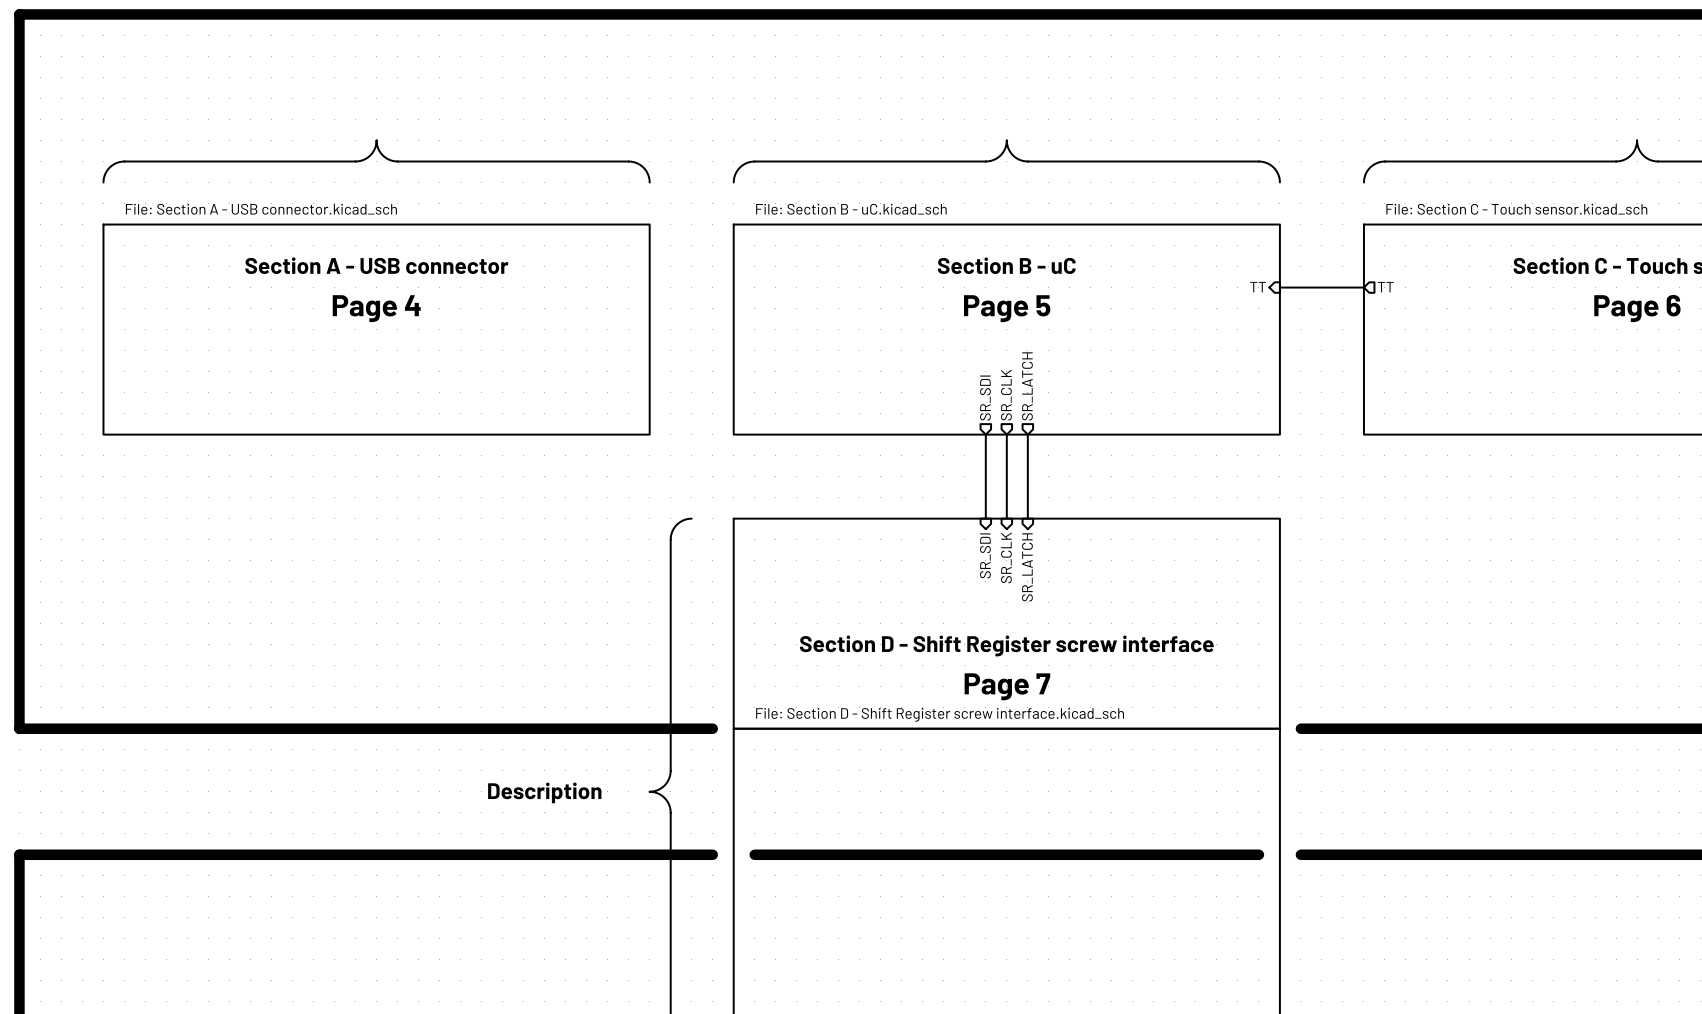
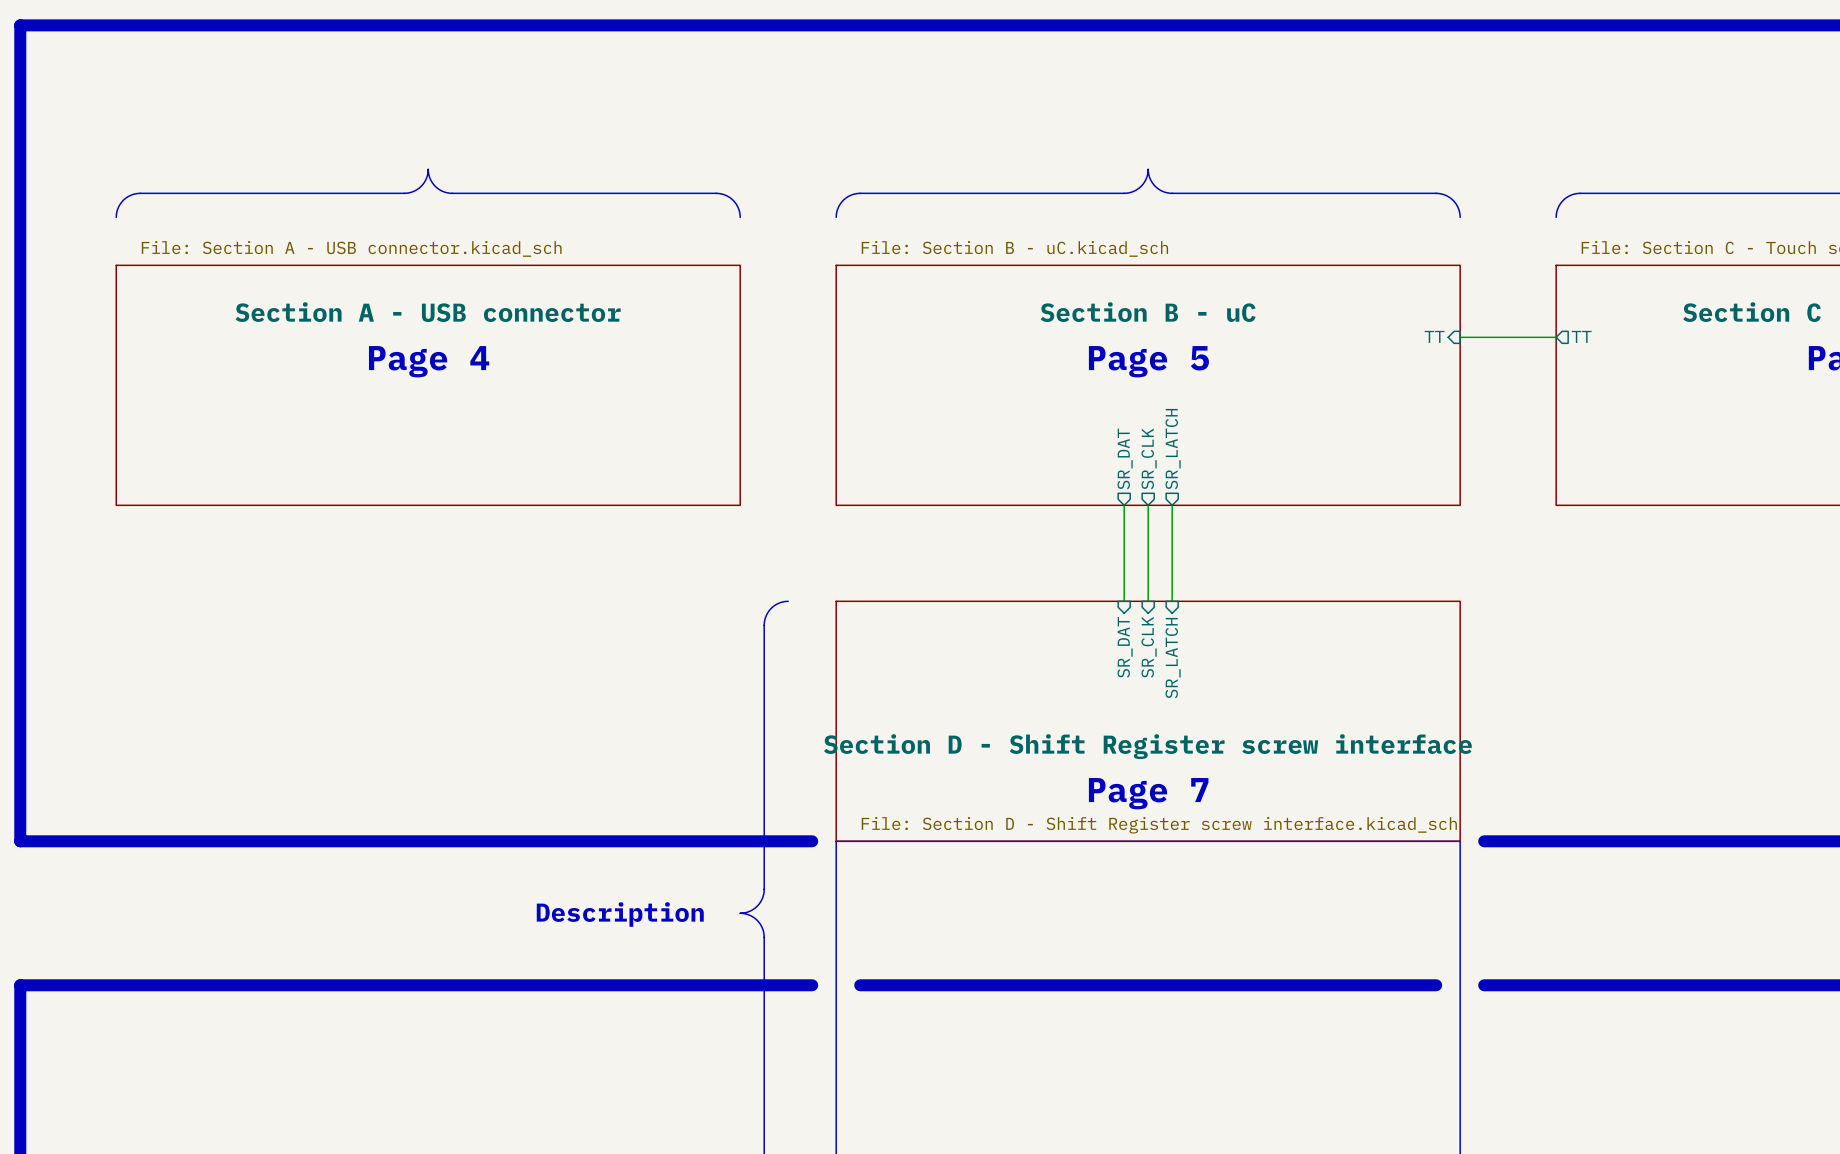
sheet pin: SR_SDI (985, 398) -> SR_DAT (1125, 458)
sheet pin: SR_SDI (985, 555) -> SR_DAT (1125, 647)

